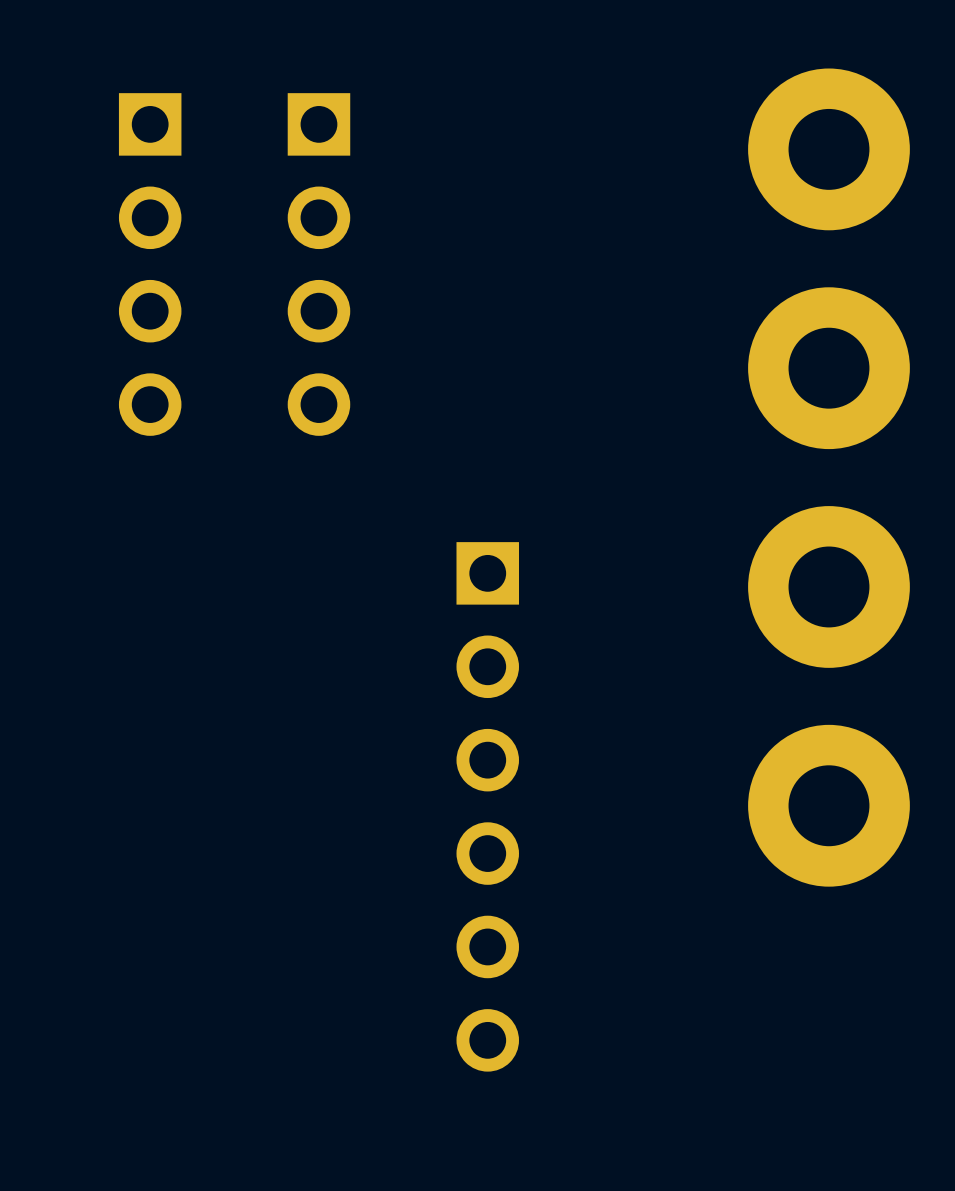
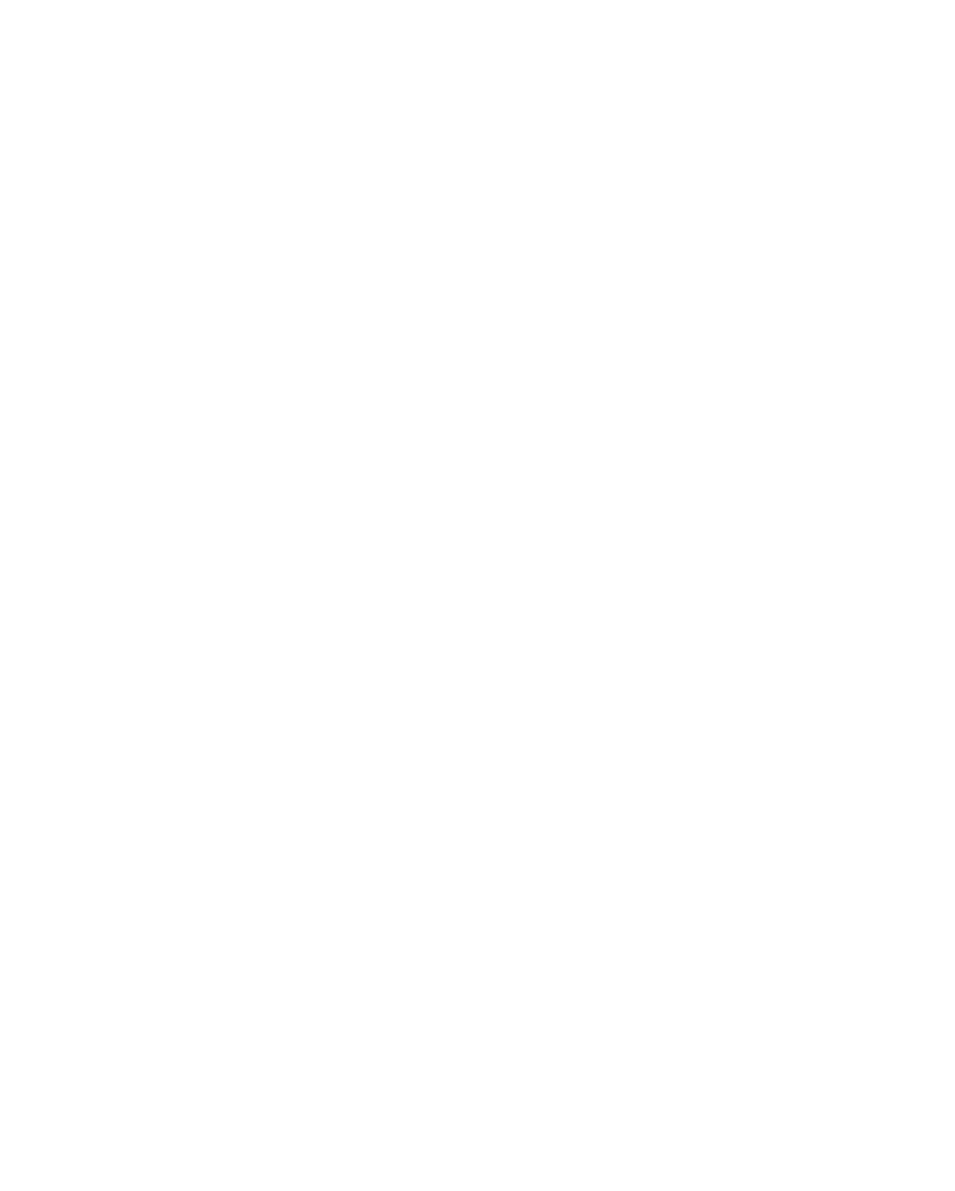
part: (828, 149) -> none
part: (150, 264) -> none
part: (318, 264) -> none
part: (828, 368) -> none
part: (828, 586) -> none
part: (828, 805) -> none
part: (487, 806) -> none

